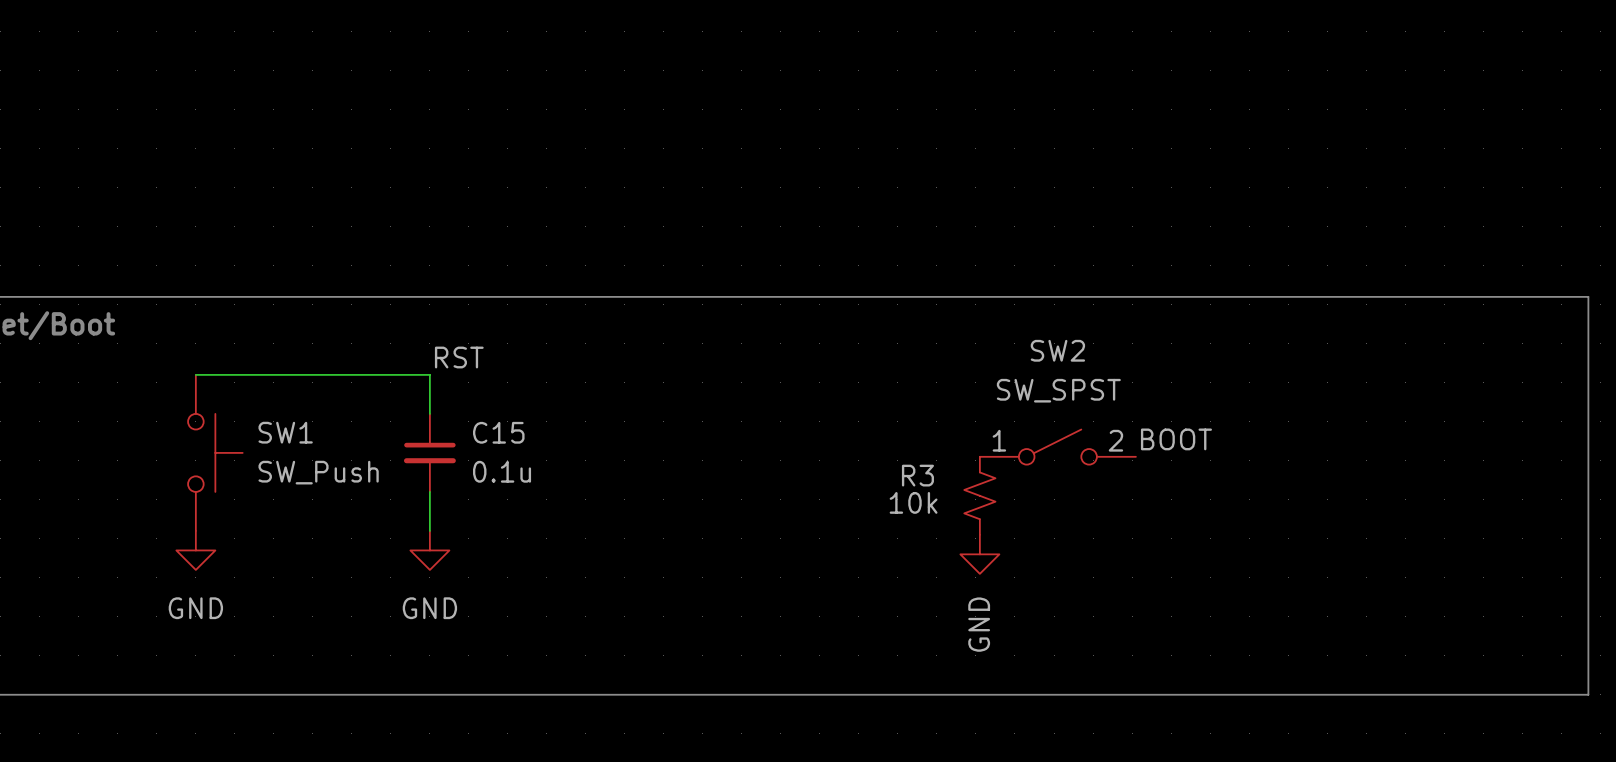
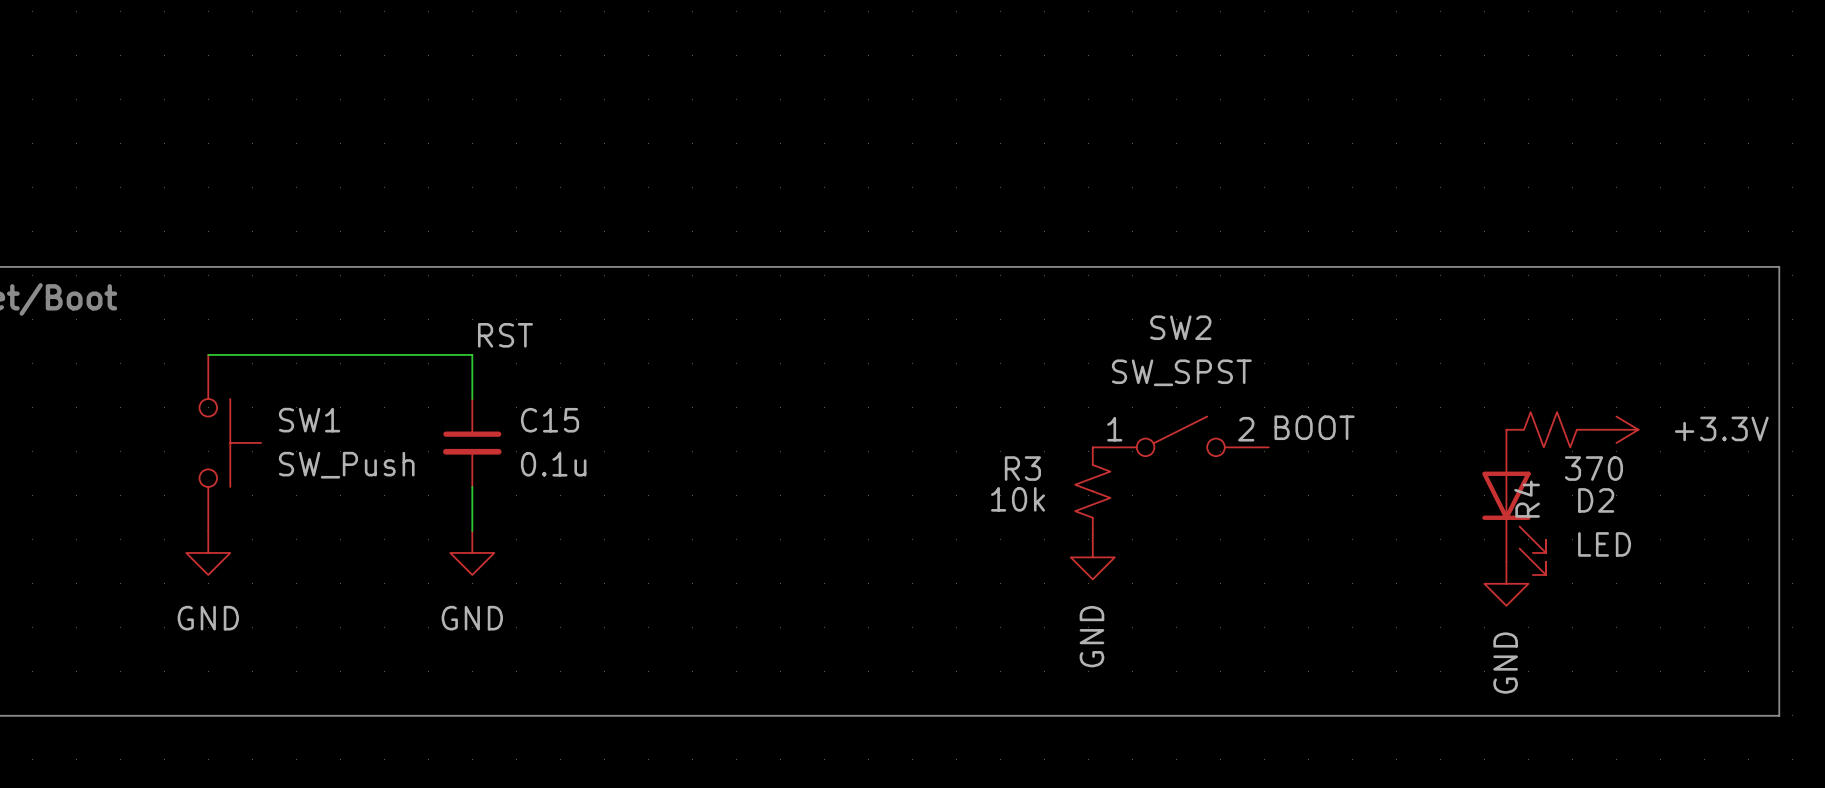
R4: none -> 370 (1550, 429)
power symbol: none -> +3.3V (1616, 429)
D2: none -> LED (1514, 502)
power symbol: none -> GND (1506, 583)

